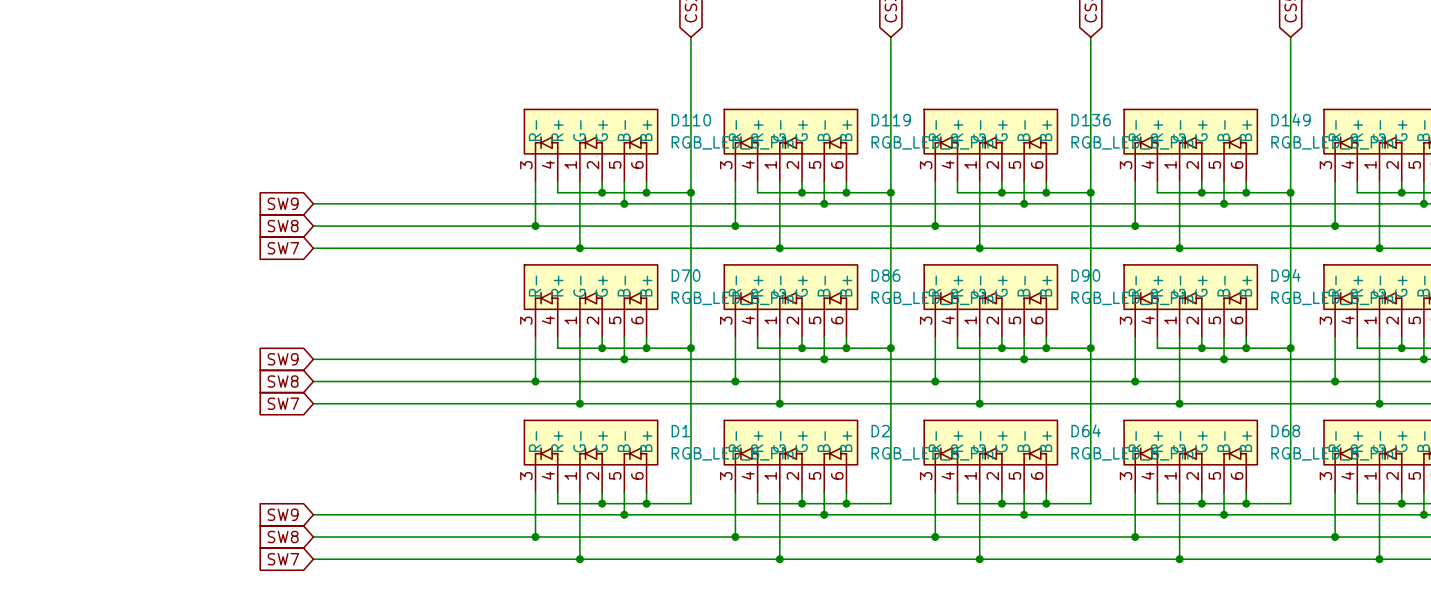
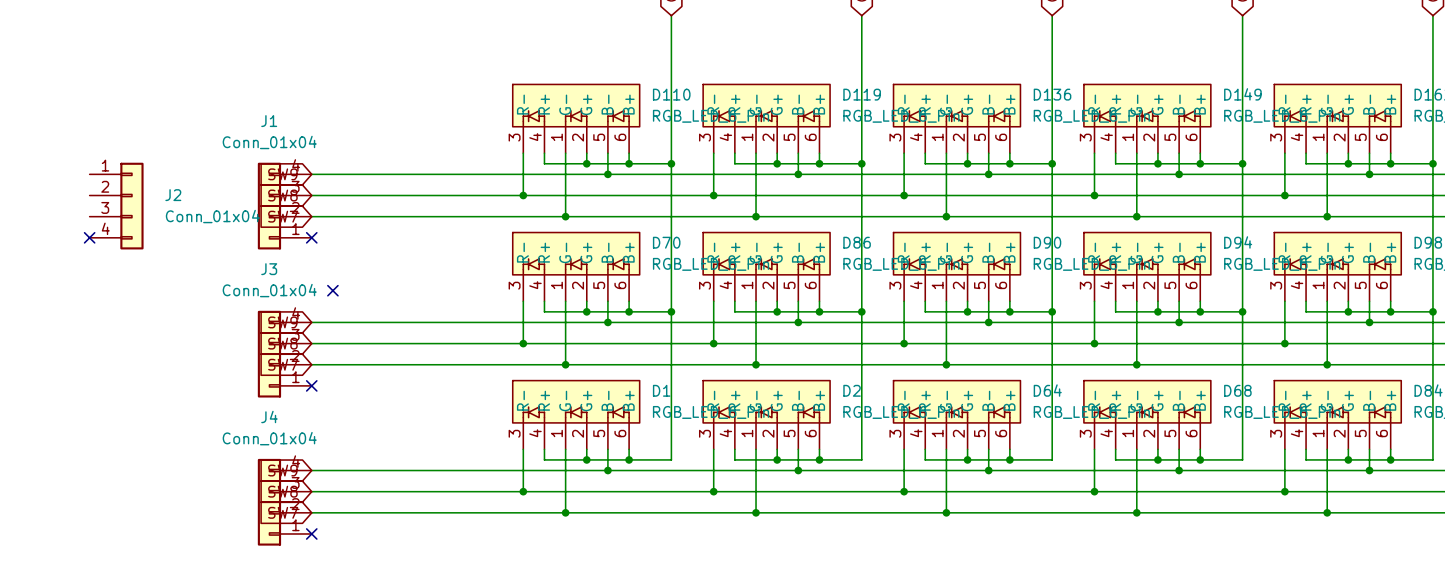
J2: none -> Conn_01x04 (116, 206)
J1: none -> Conn_01x04 (284, 206)
no-connect mark: none -> (89, 237)
no-connect mark: none -> (311, 237)
no-connect mark: none -> (332, 290)
J3: none -> Conn_01x04 (284, 354)
no-connect mark: none -> (311, 385)
J4: none -> Conn_01x04 (284, 502)
no-connect mark: none -> (311, 533)

